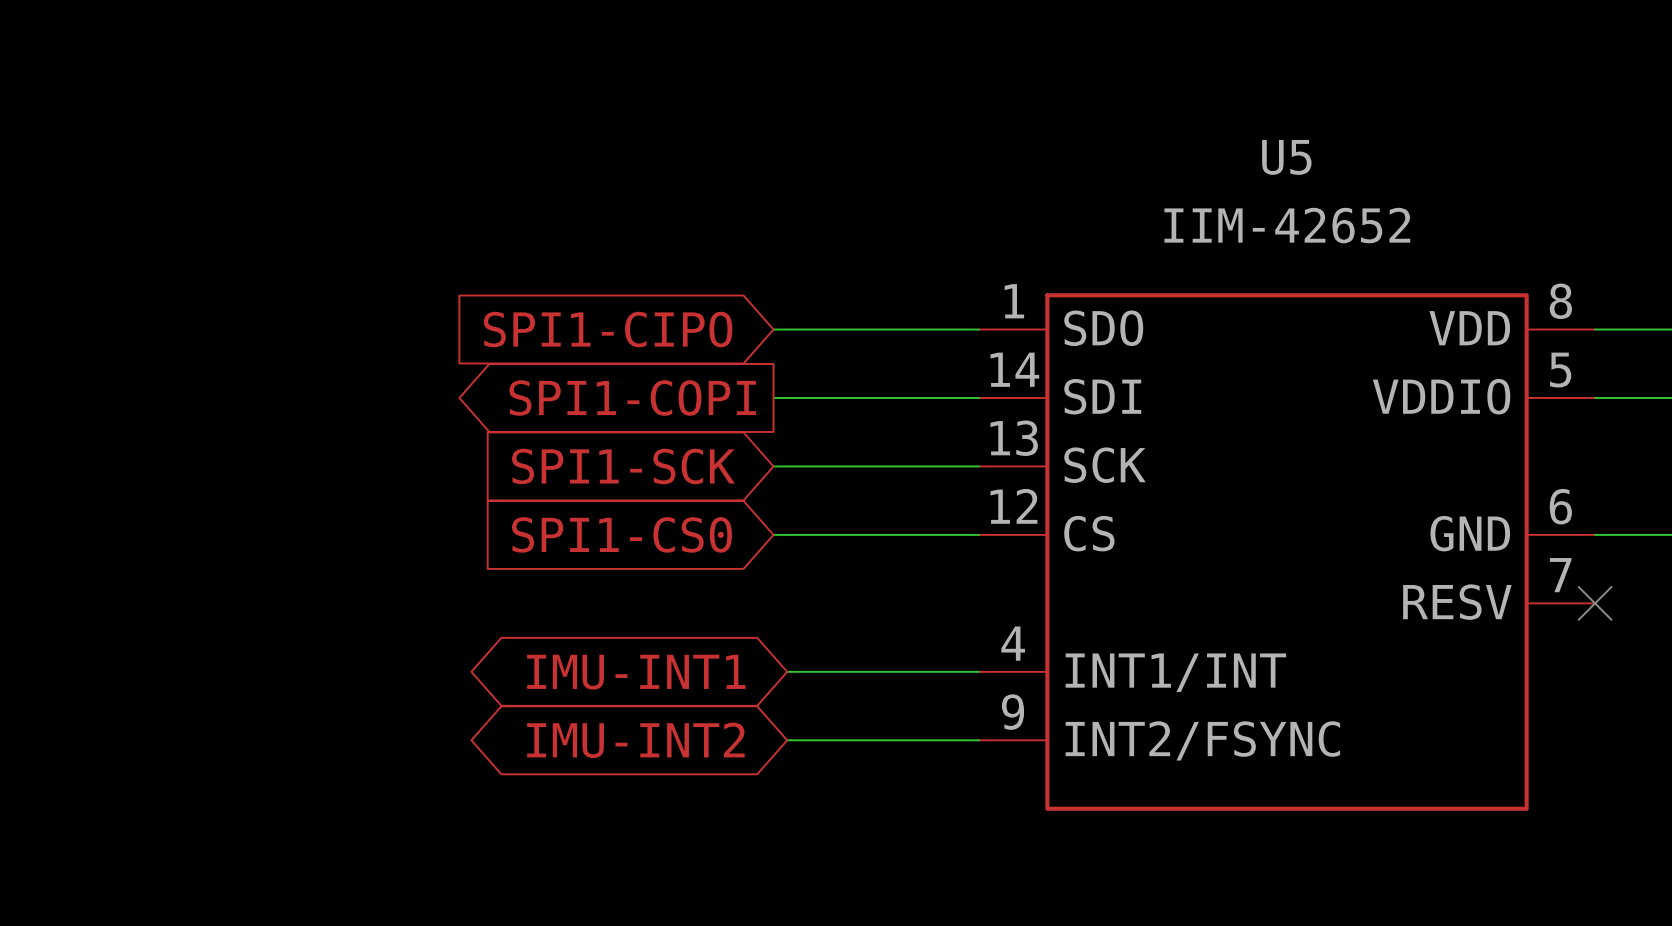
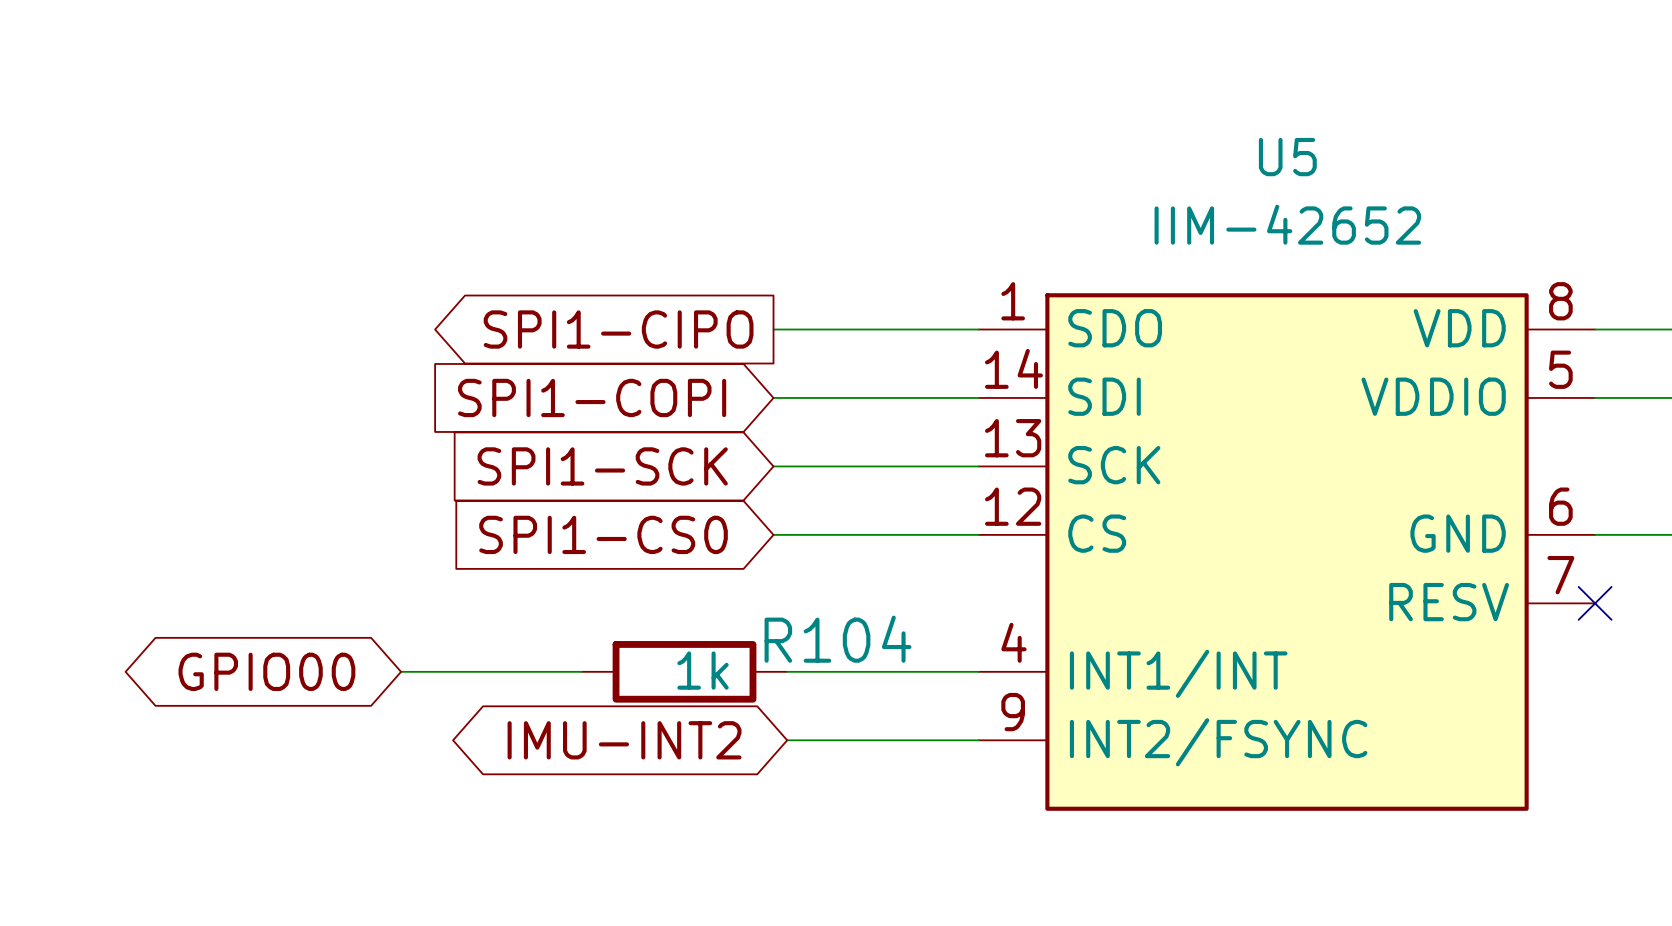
global label shape: input (608, 329) -> output (618, 329)
global label shape: output (632, 398) -> input (592, 397)
global label: none -> GPIO00 (266, 671)
wire: none -> (401, 671) (581, 671)
R104: none -> (684, 671)
global label: IMU-INT1 (636, 672) -> none

